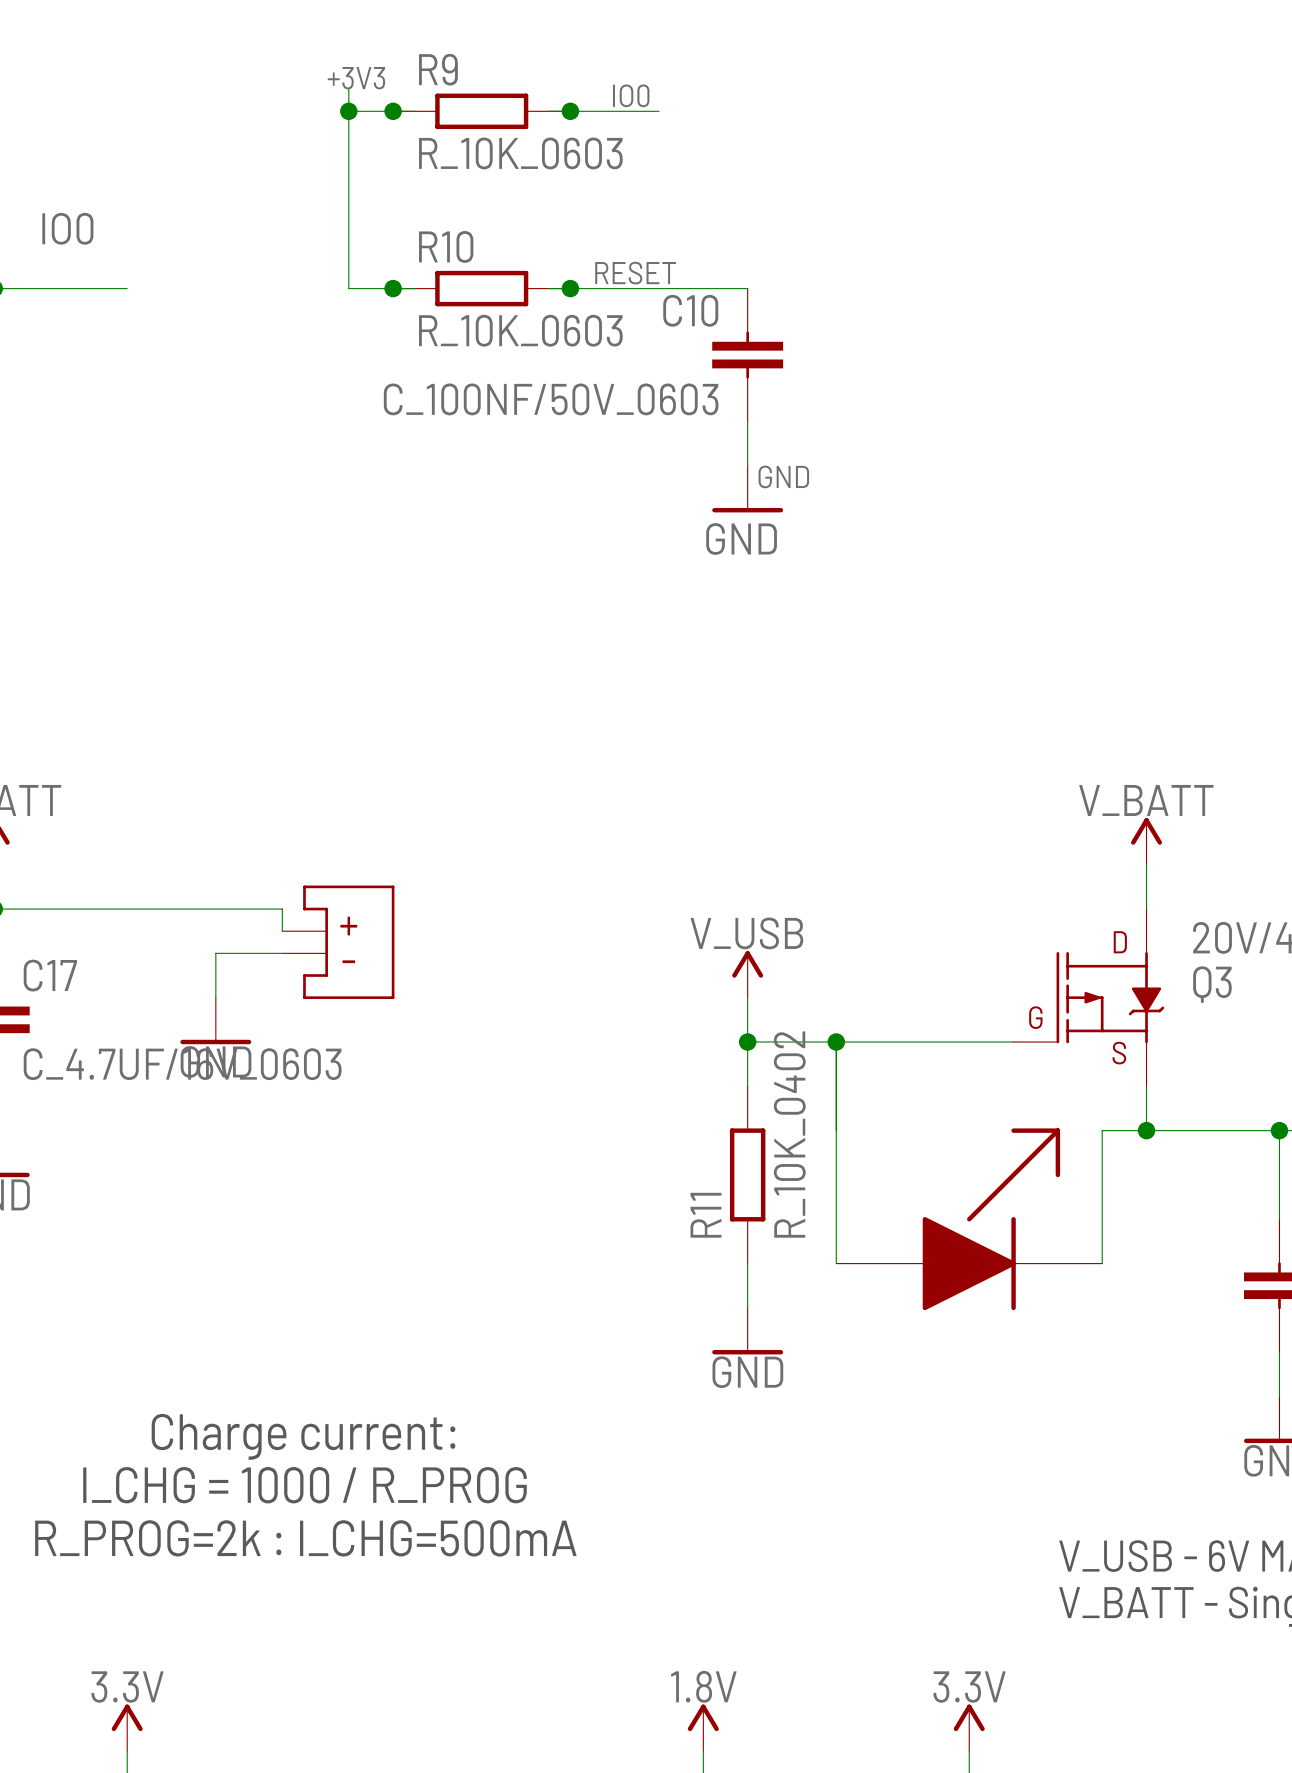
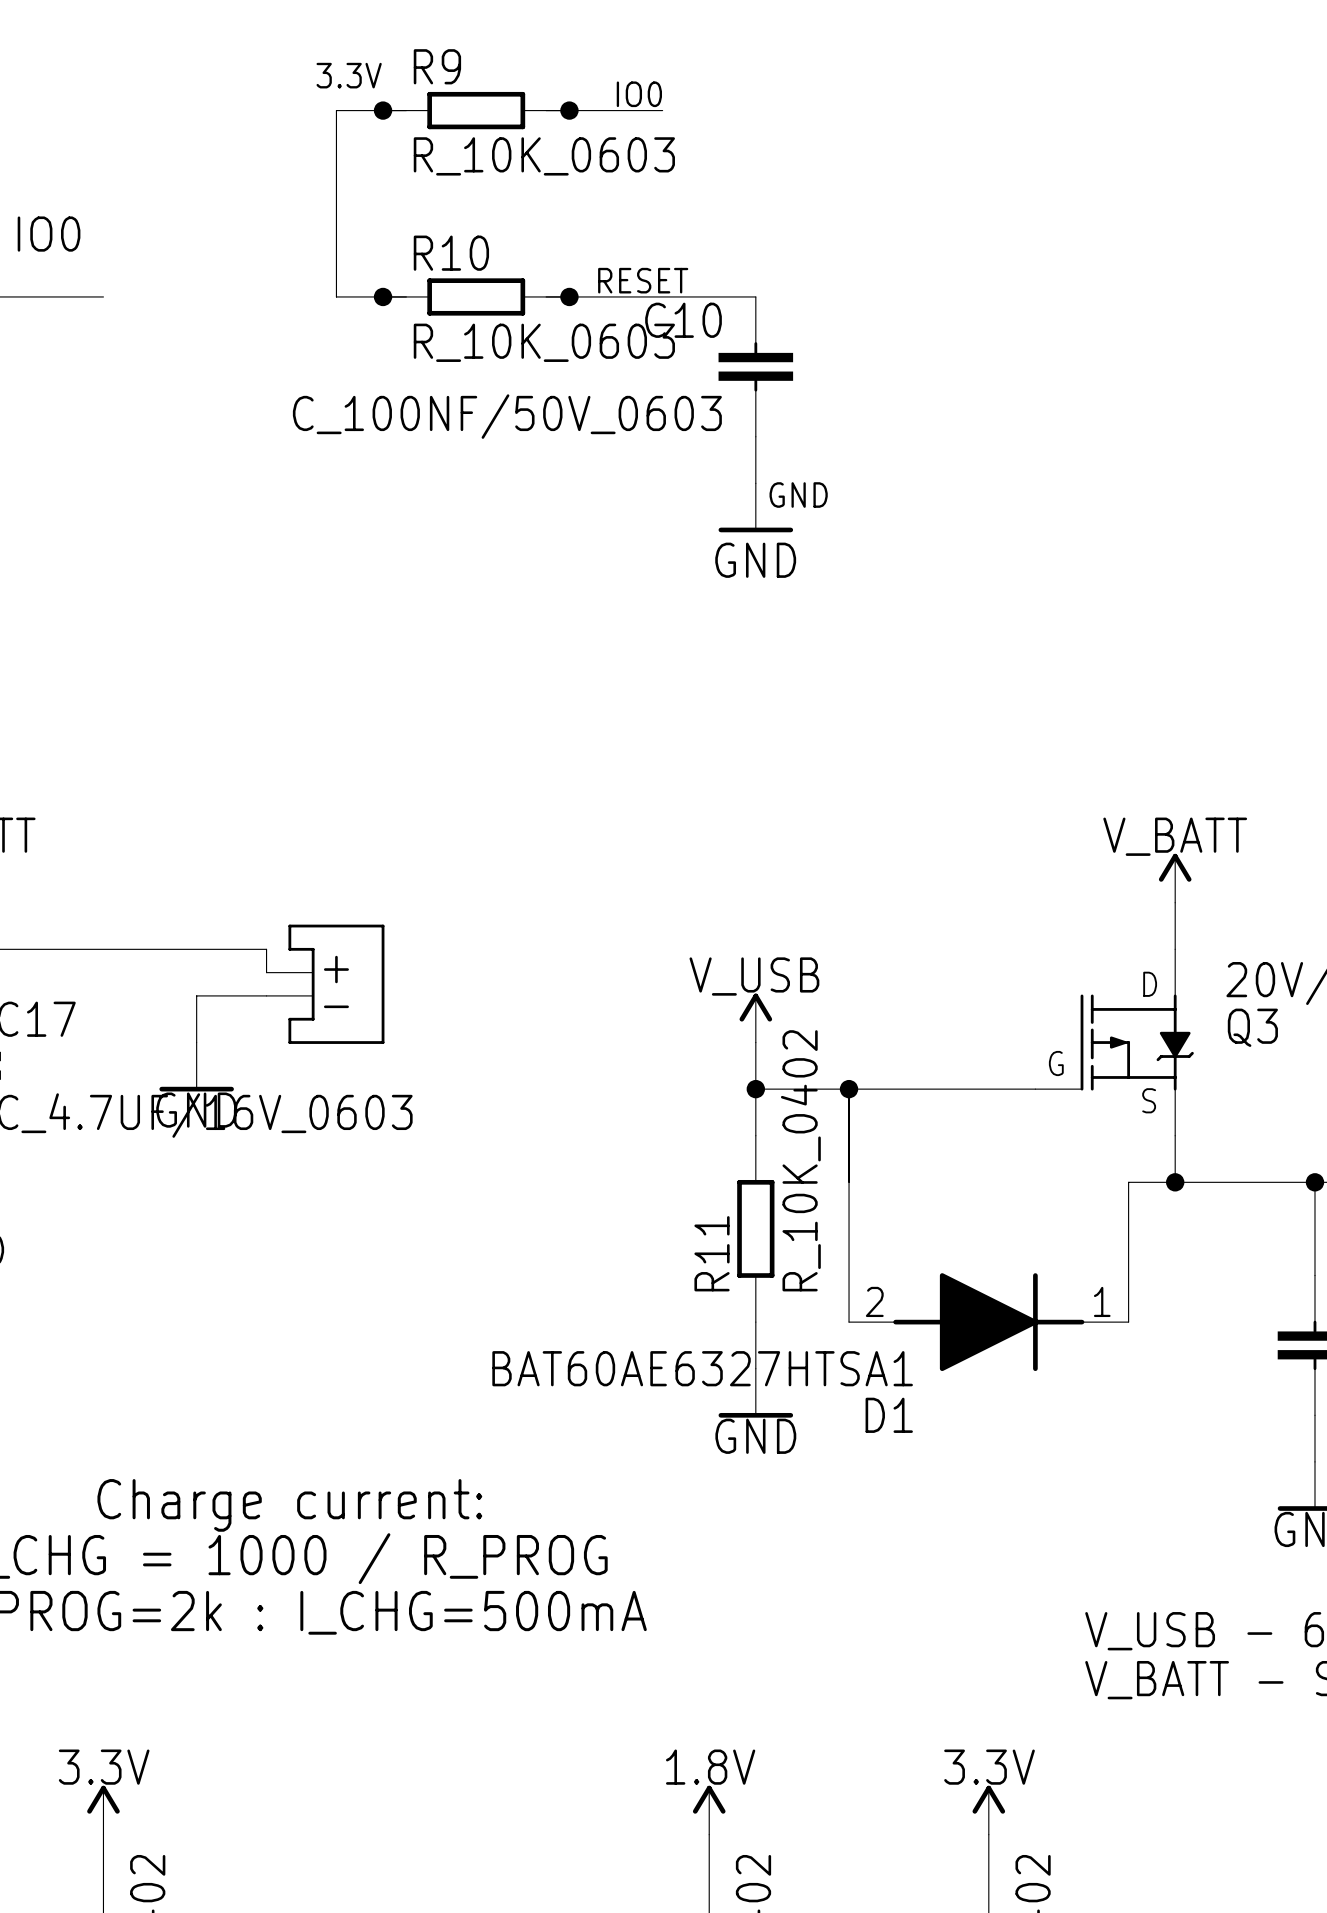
label: +3V3 (356, 78) -> 3.3V (349, 75)
wire: (348, 89) (348, 111) -> none
junction: (348, 111) -> none
part: (969, 1219) -> none
D1: none -> BAT60AE6327HTSA1 (988, 1322)

